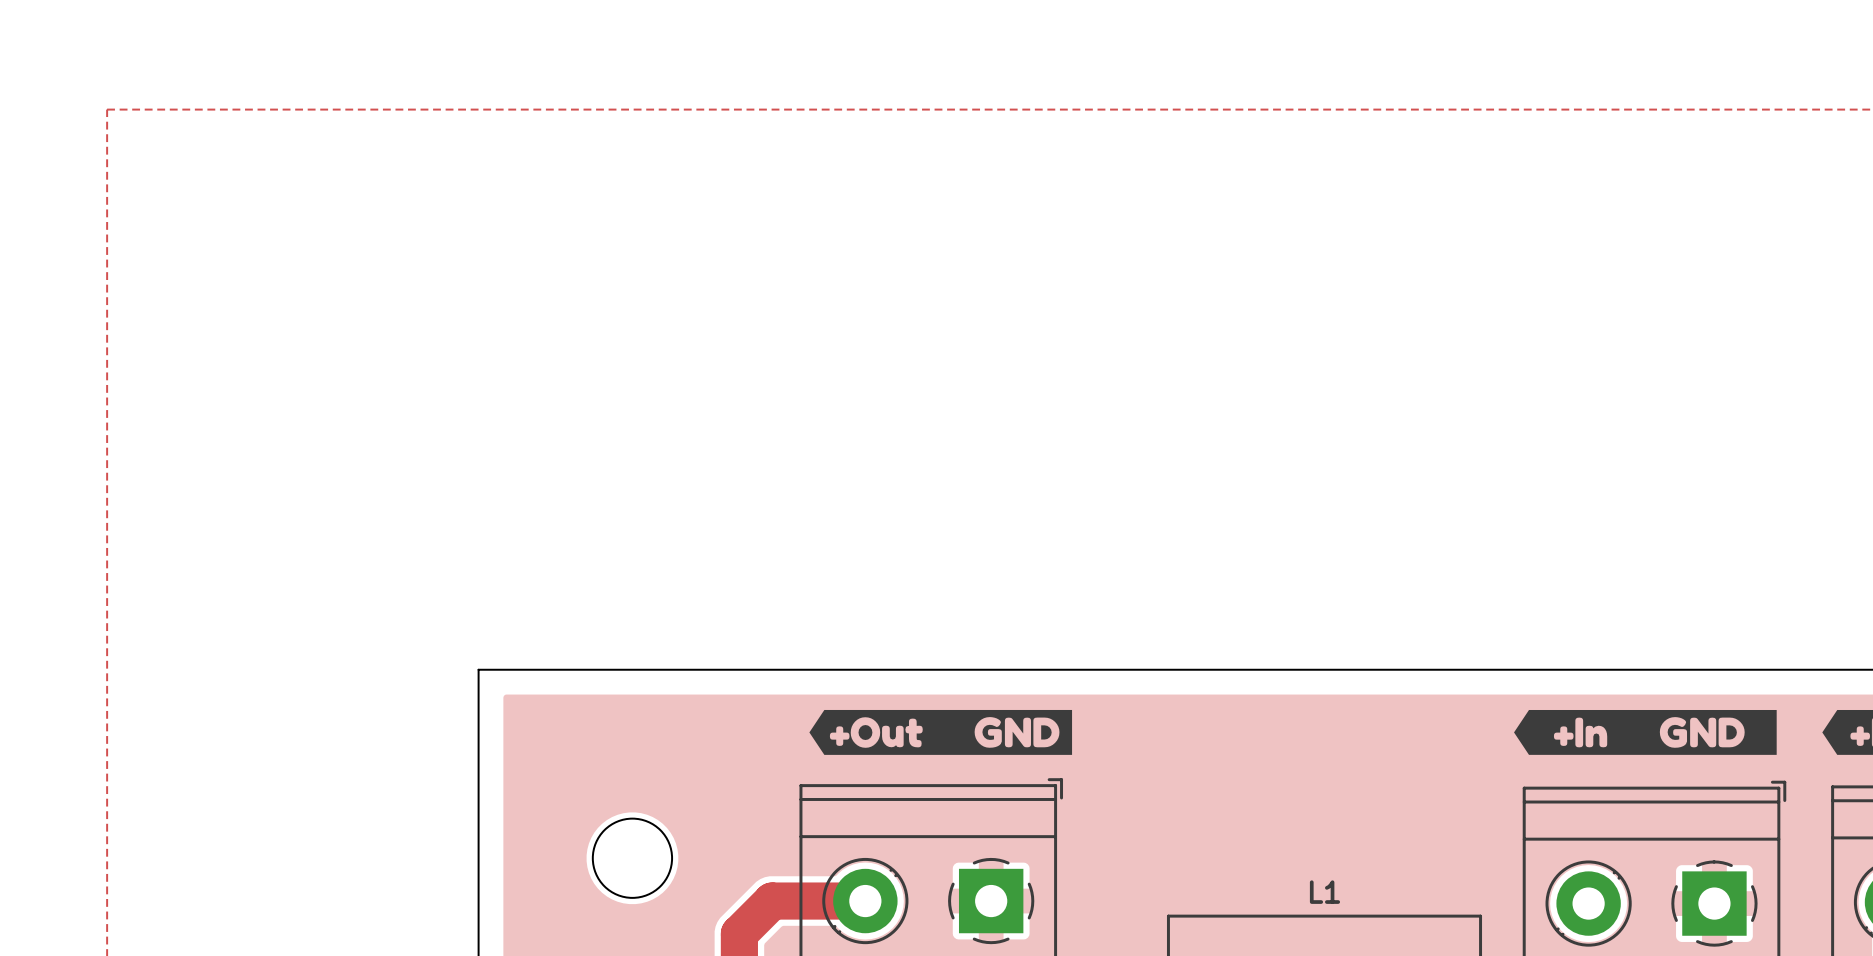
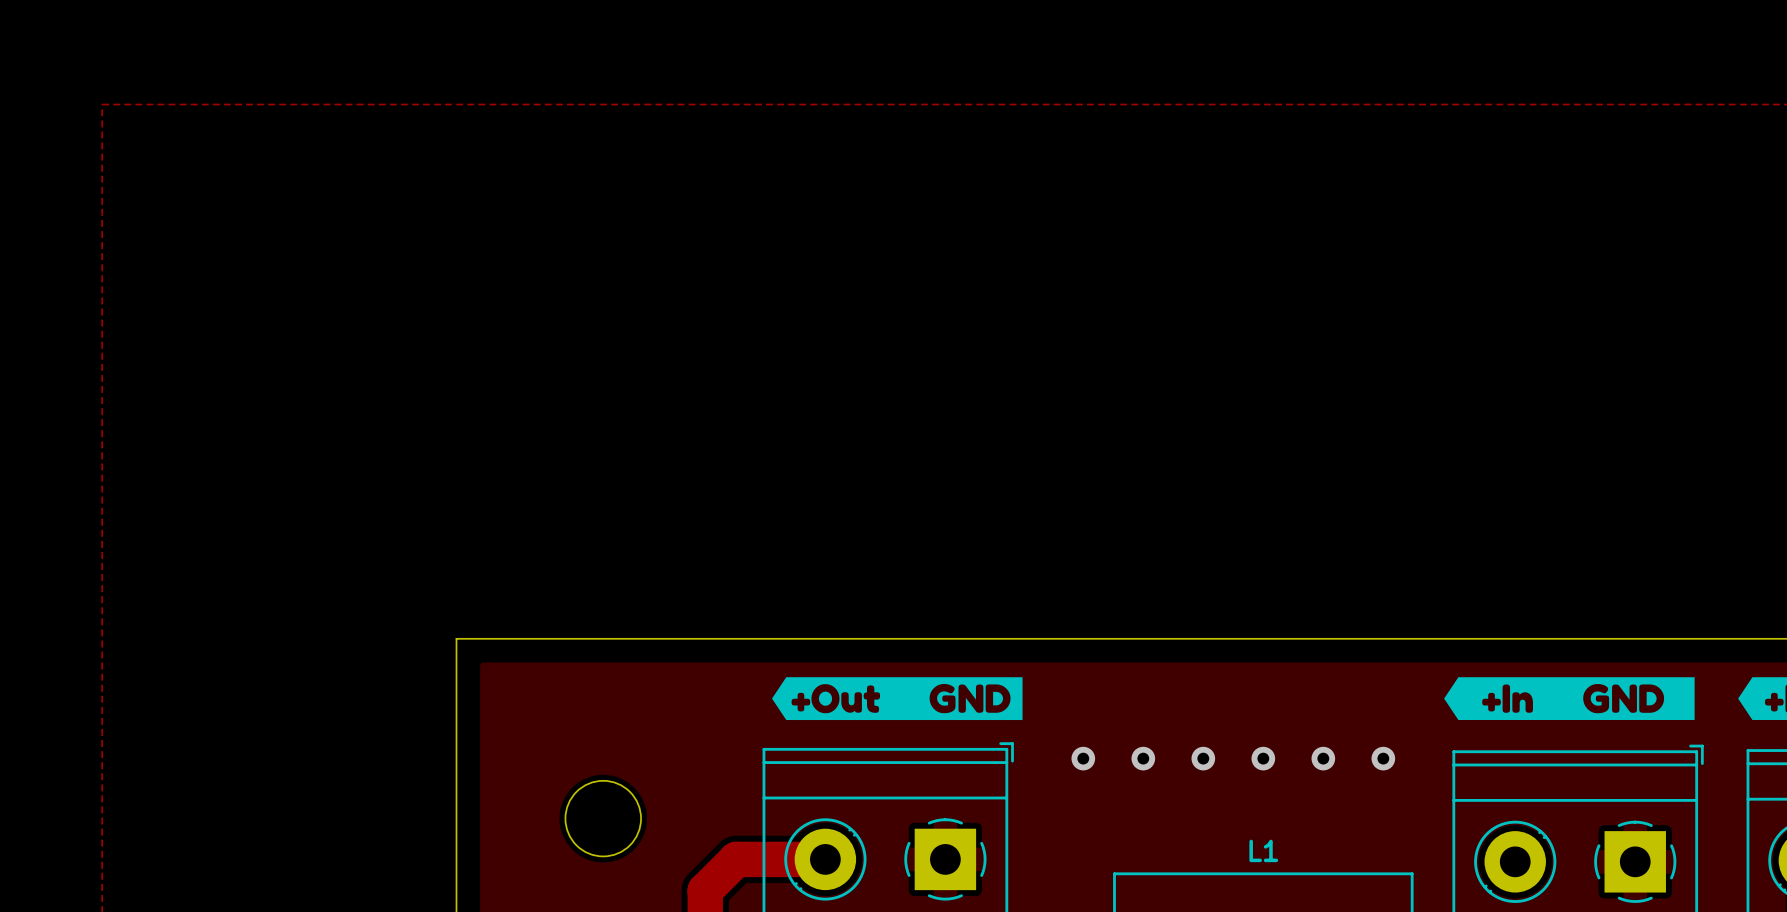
via: none -> (1083, 758)
via: none -> (1143, 758)
via: none -> (1203, 758)
via: none -> (1263, 758)
via: none -> (1323, 758)
via: none -> (1383, 758)

